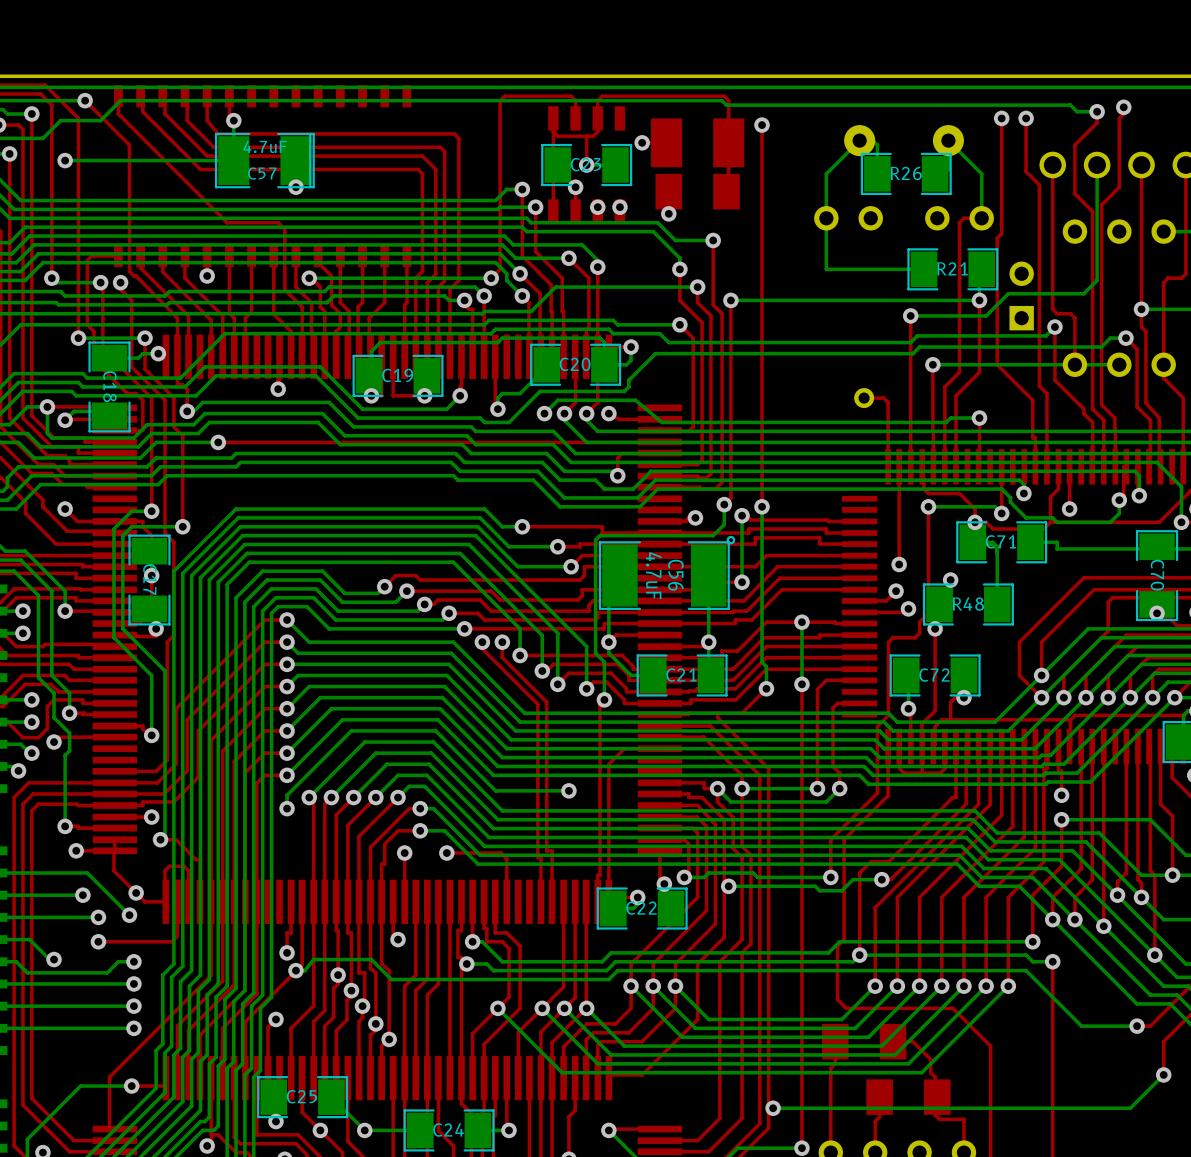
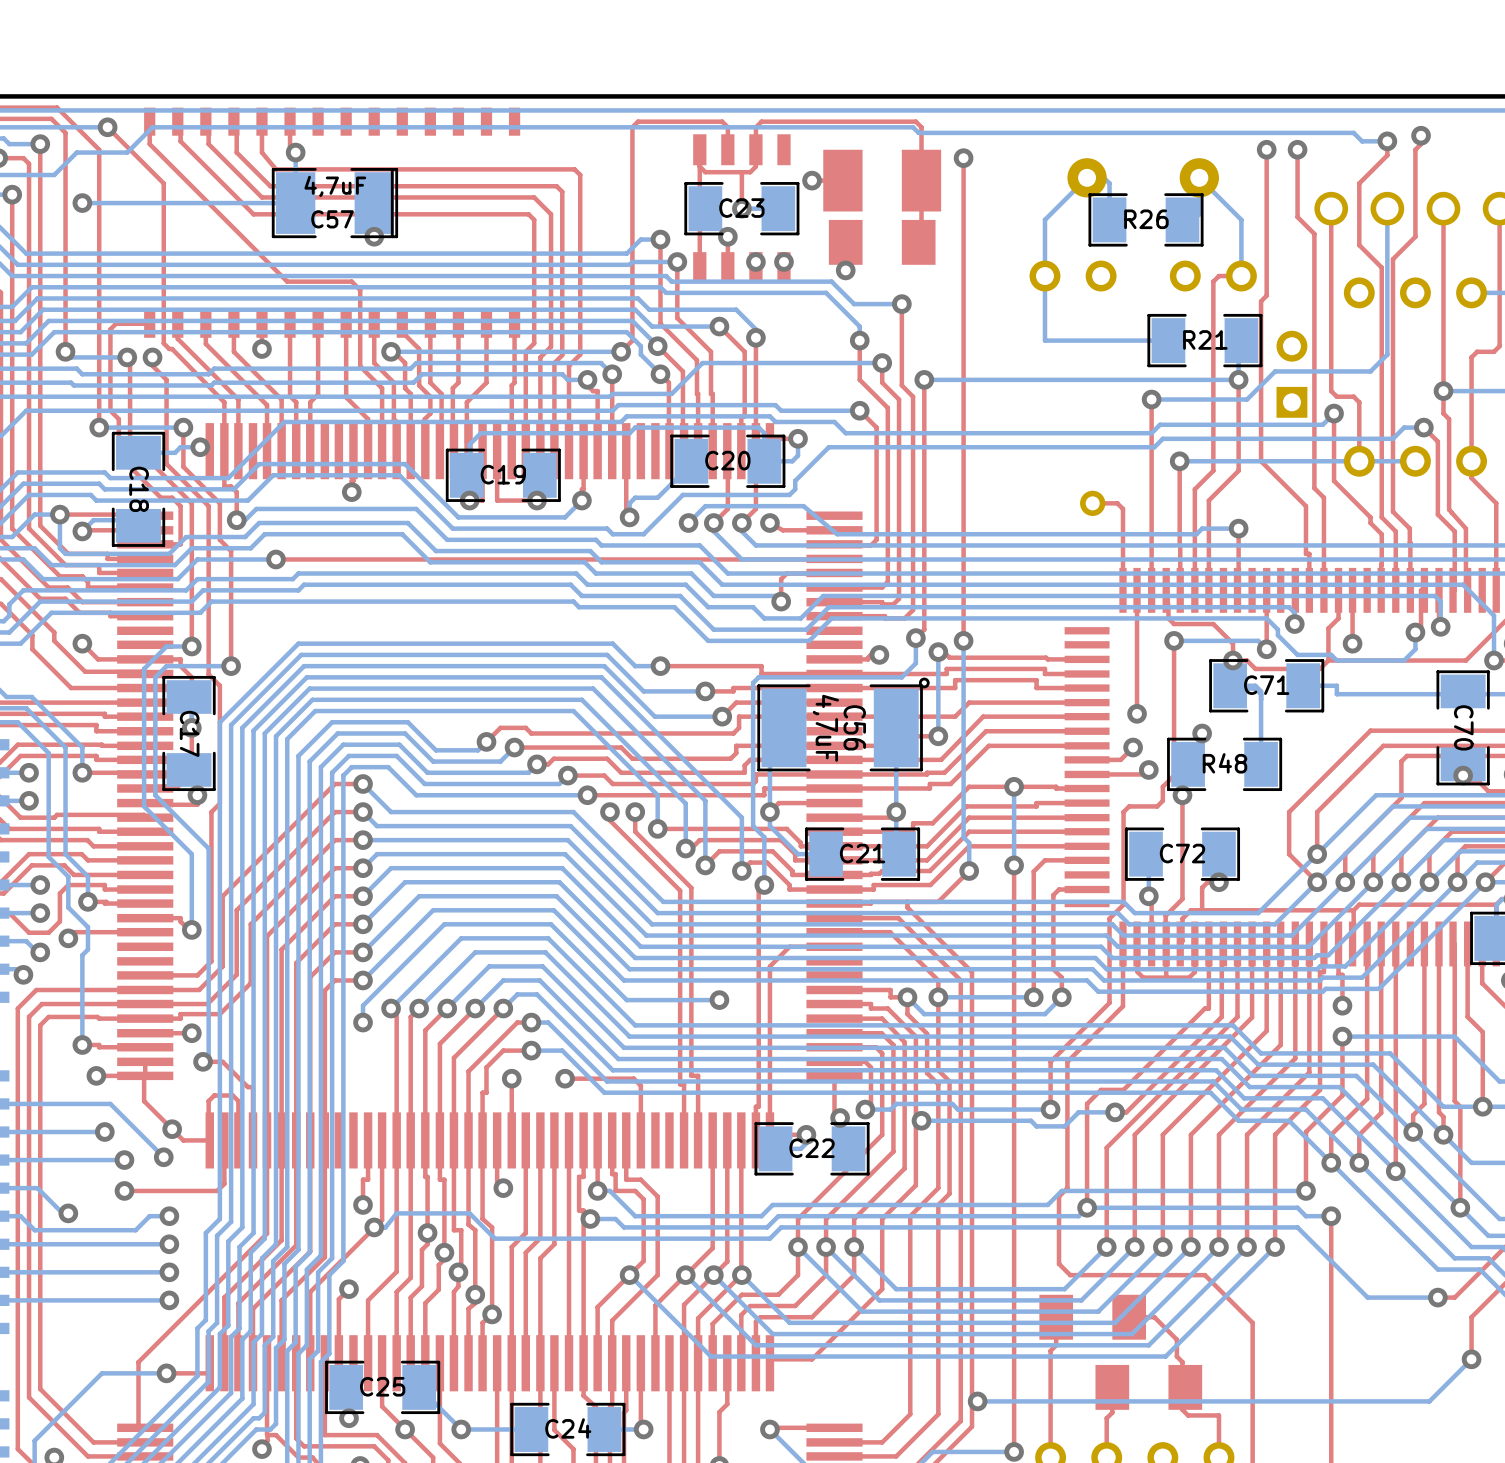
C57 value: 4.7uF (265, 146) -> 4,7uF (335, 186)
C56 value: 4.7uF (653, 575) -> 4,7uF (825, 728)

